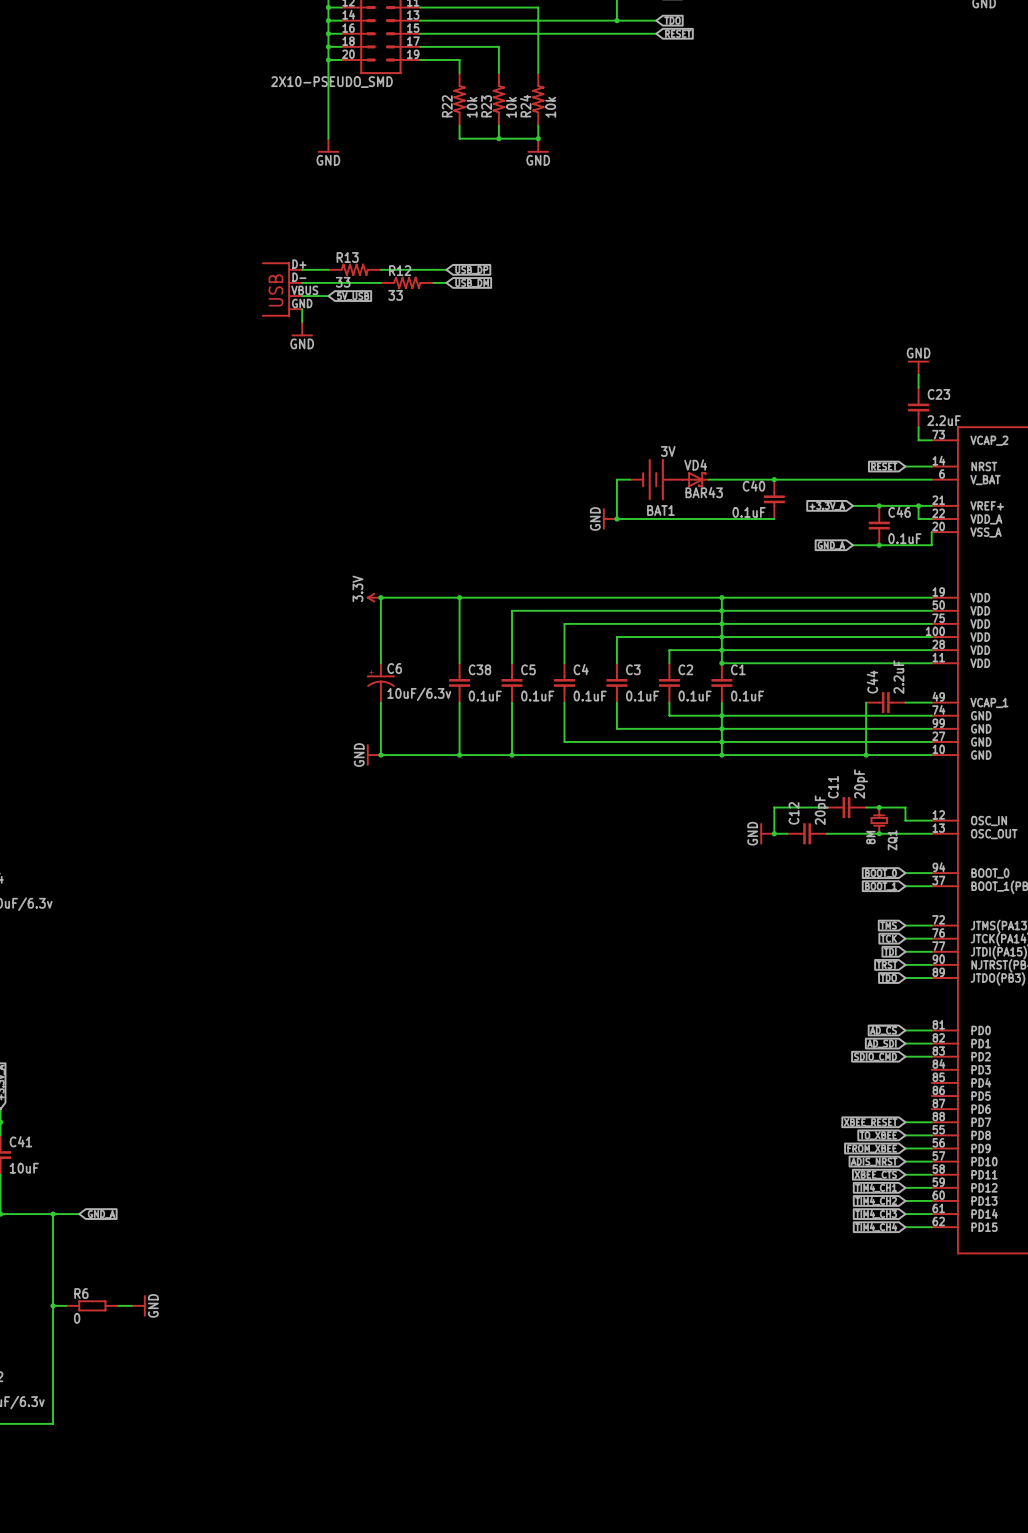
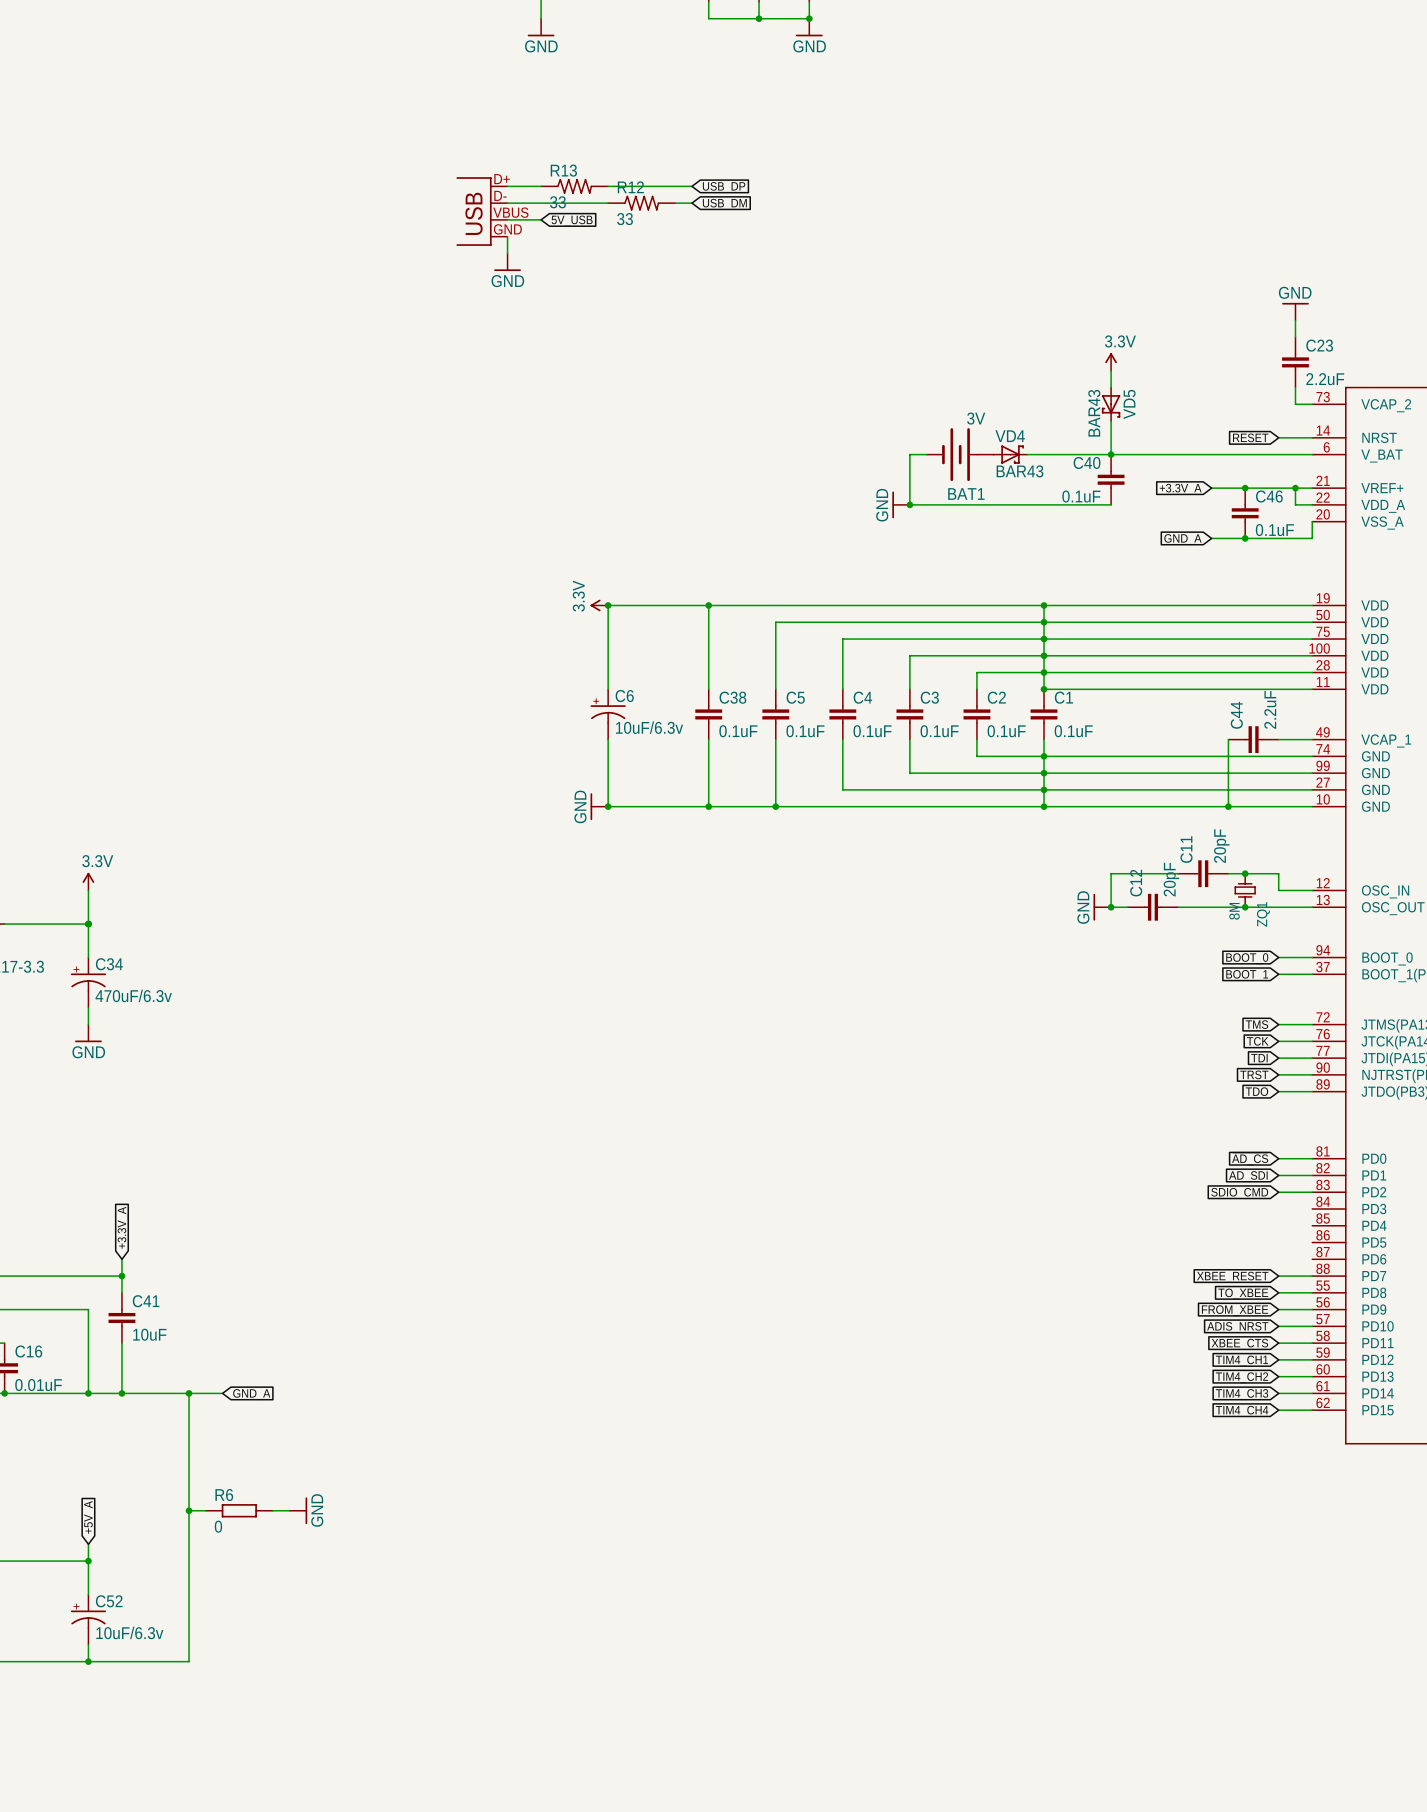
power symbol: none -> 3.3V (1111, 361)
wire: none -> (1111, 370) (1111, 387)
VD5: none -> BAR43 (1111, 404)
wire: none -> (1111, 421) (1111, 454)

